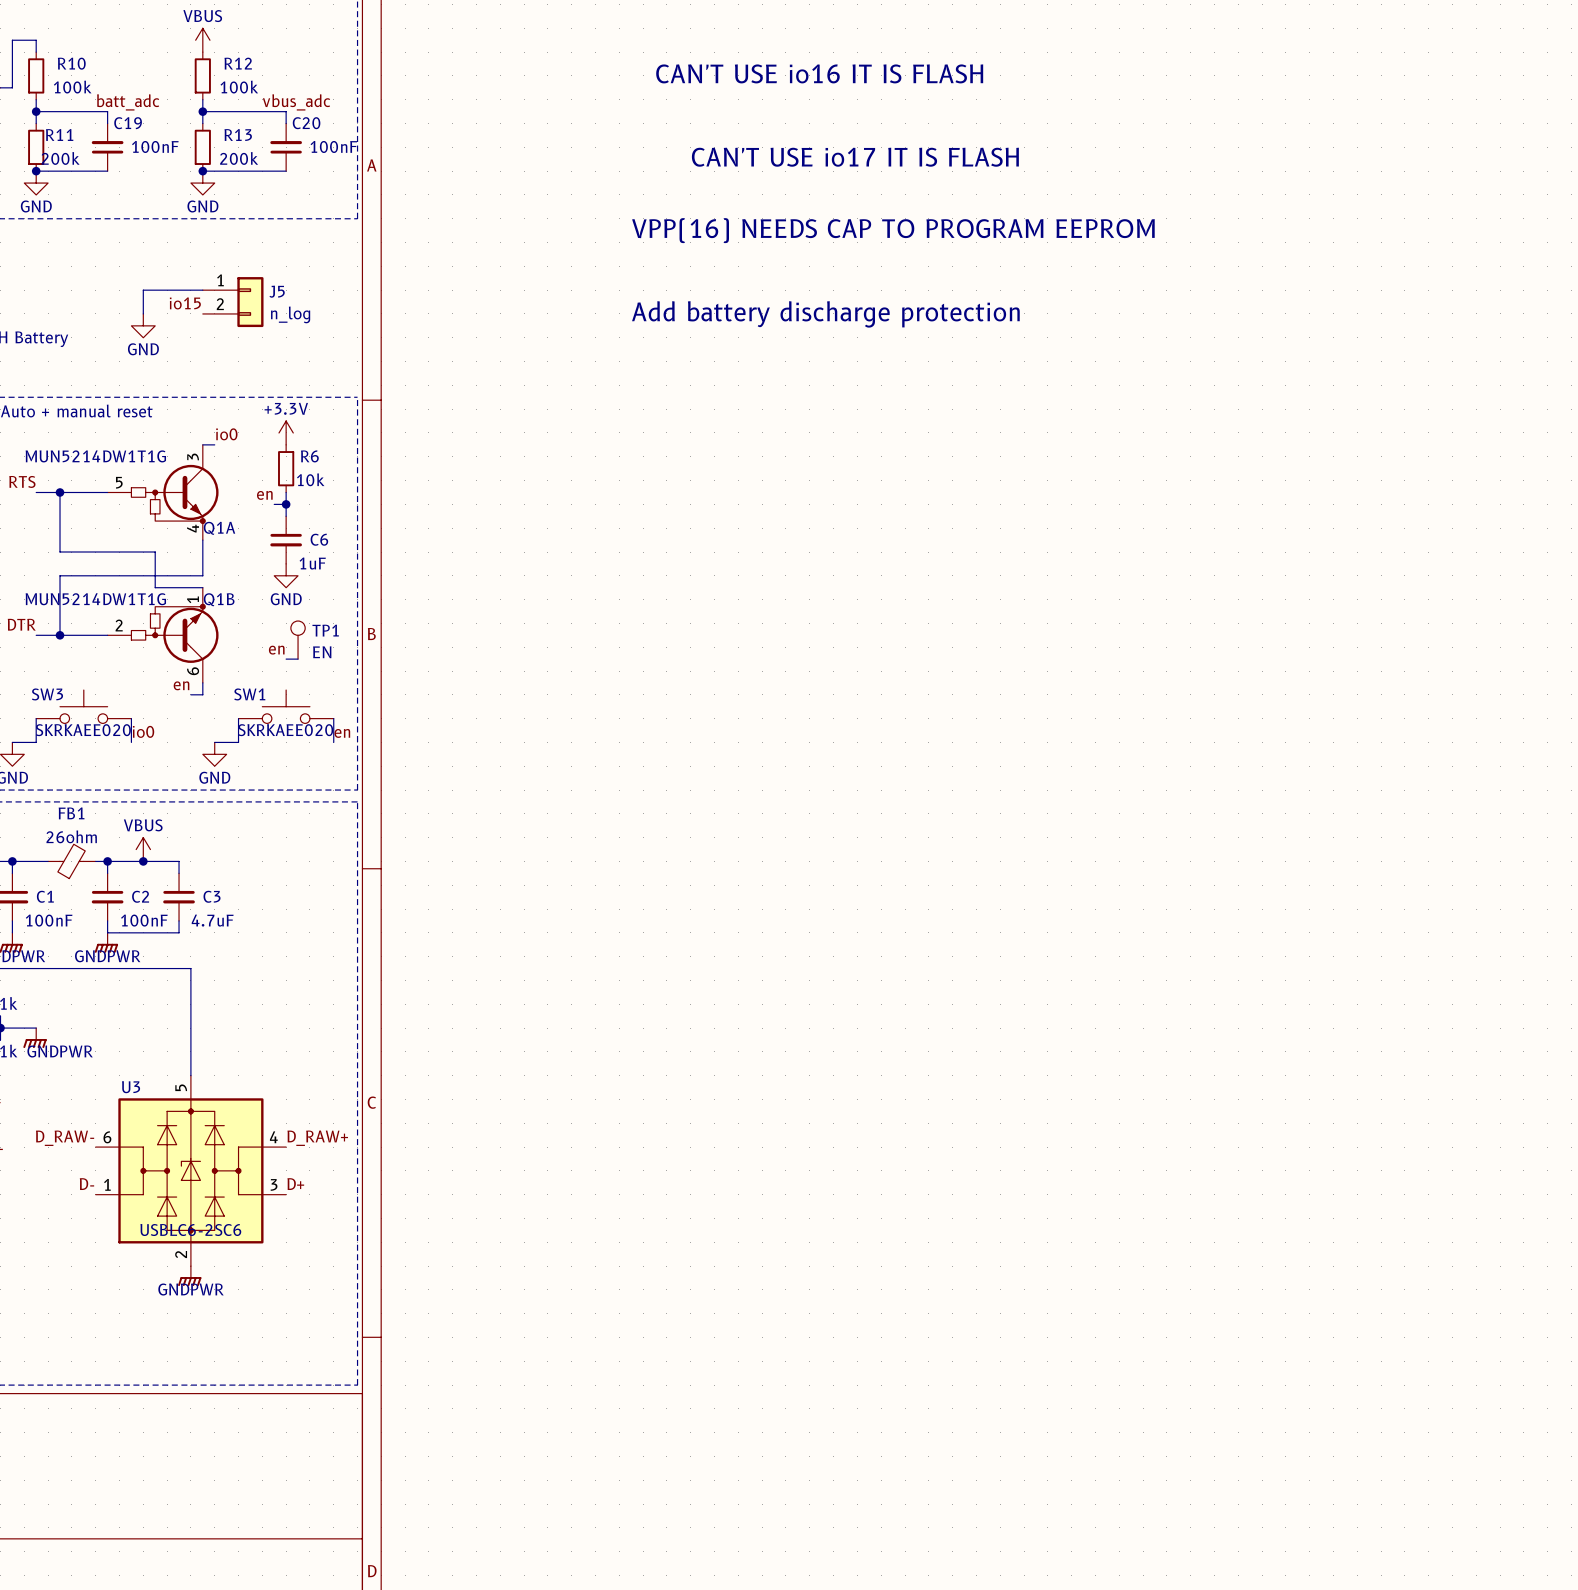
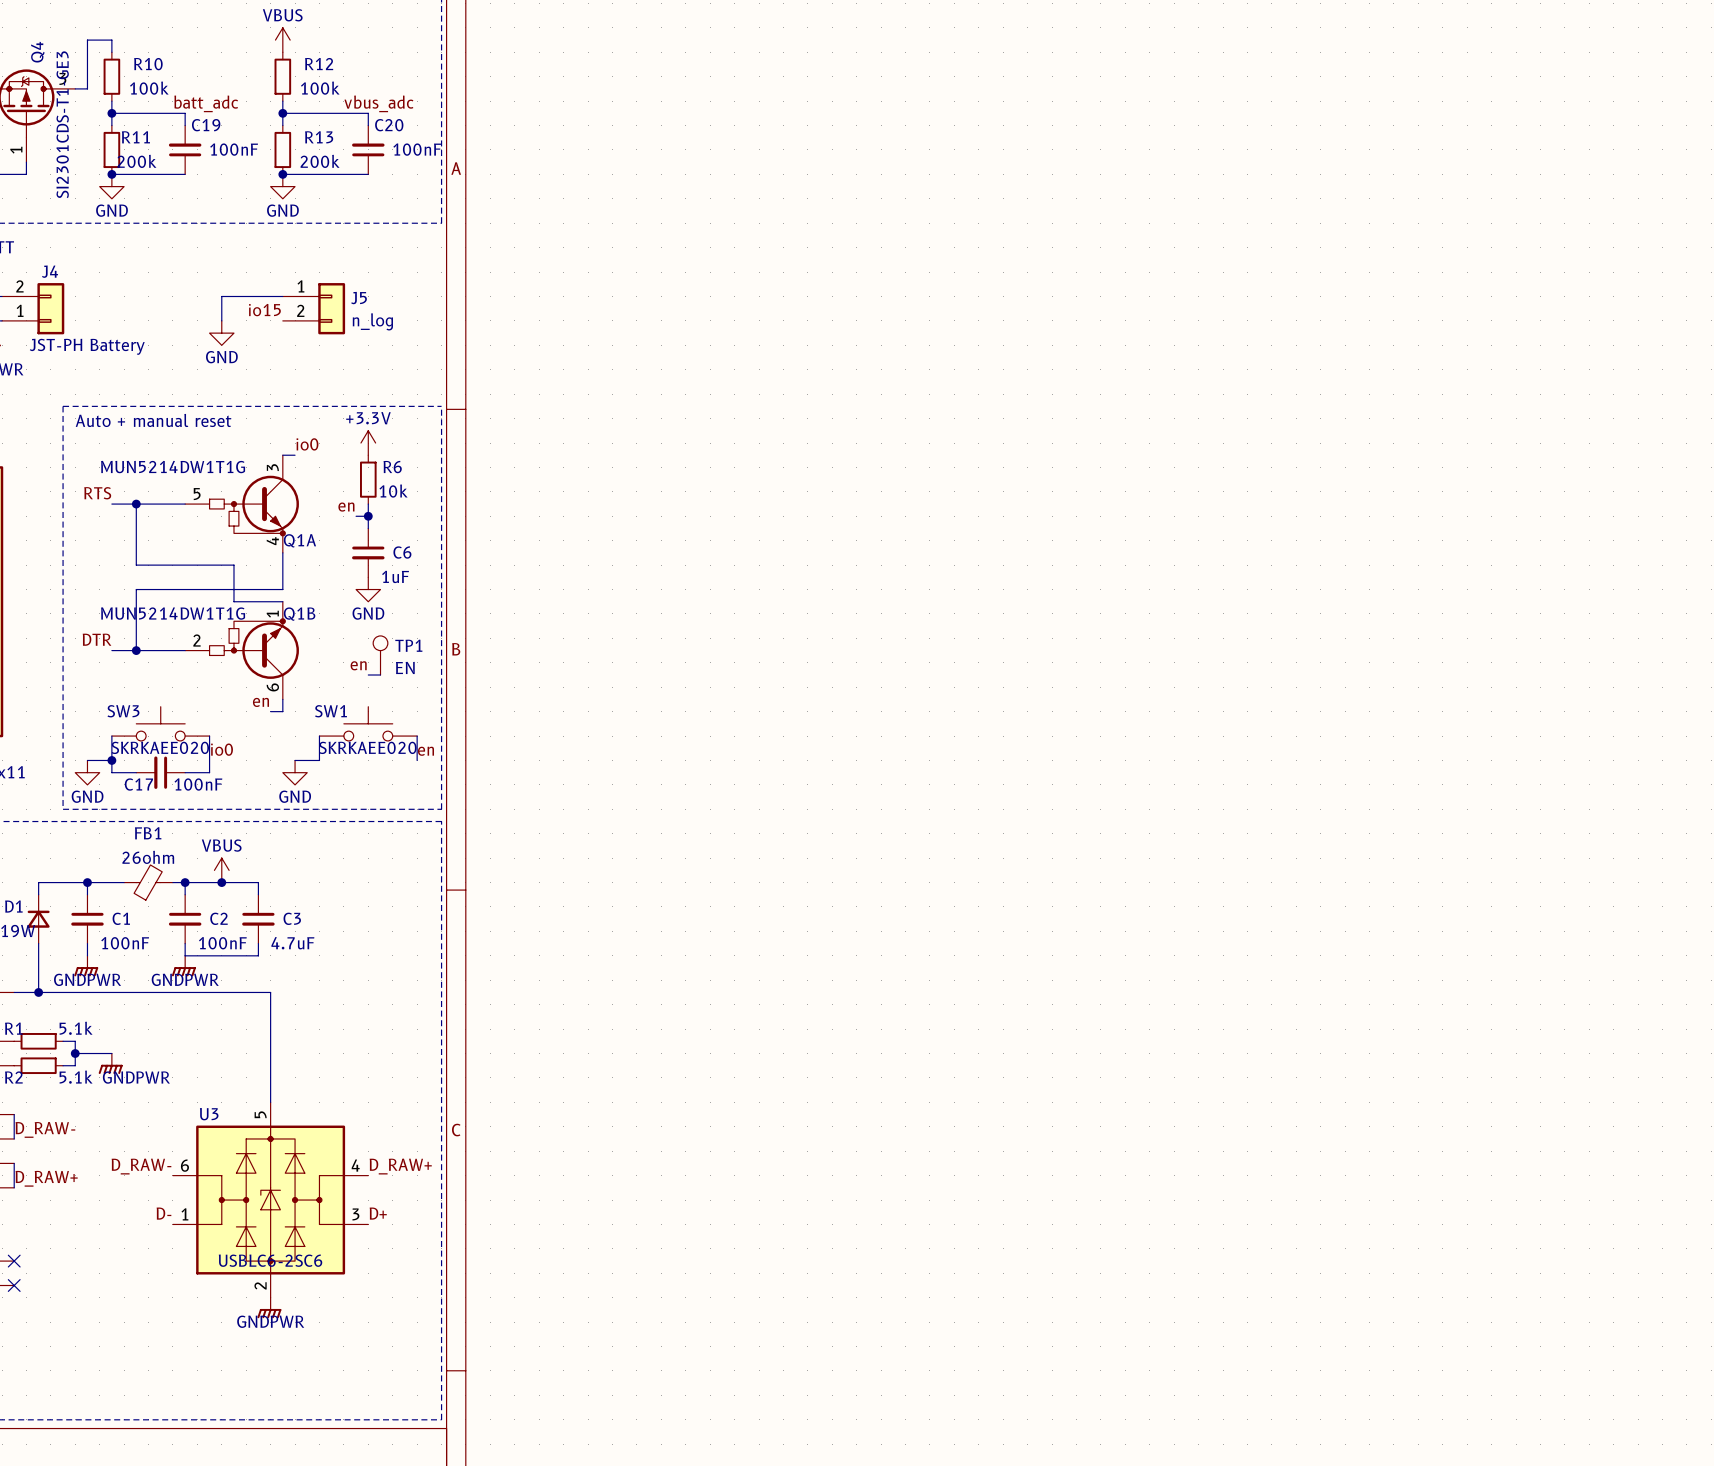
text: CAN'T USE io16 IT IS FLASH (819, 73) -> none
text: CAN'T USE io17 IT IS FLASH (855, 157) -> none
text: VPP(16) NEEDS CAP TO PROGRAM EEPROM (893, 230) -> none
text: Add battery discharge protection (825, 314) -> none
wire: none -> (111, 760) (111, 772) (136, 772)
junction: none -> (111, 760)
wire: none -> (209, 760) (209, 772) (185, 772)
C17: none -> 100nF (160, 772)

